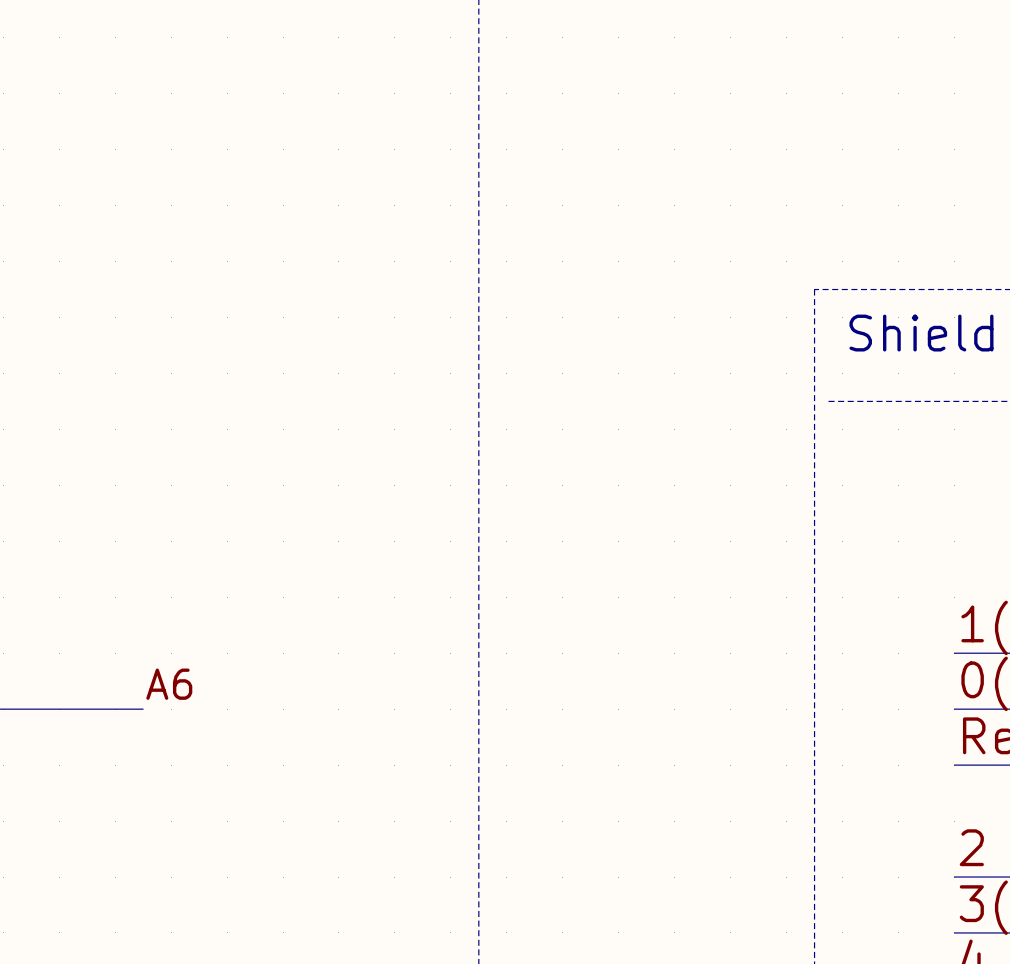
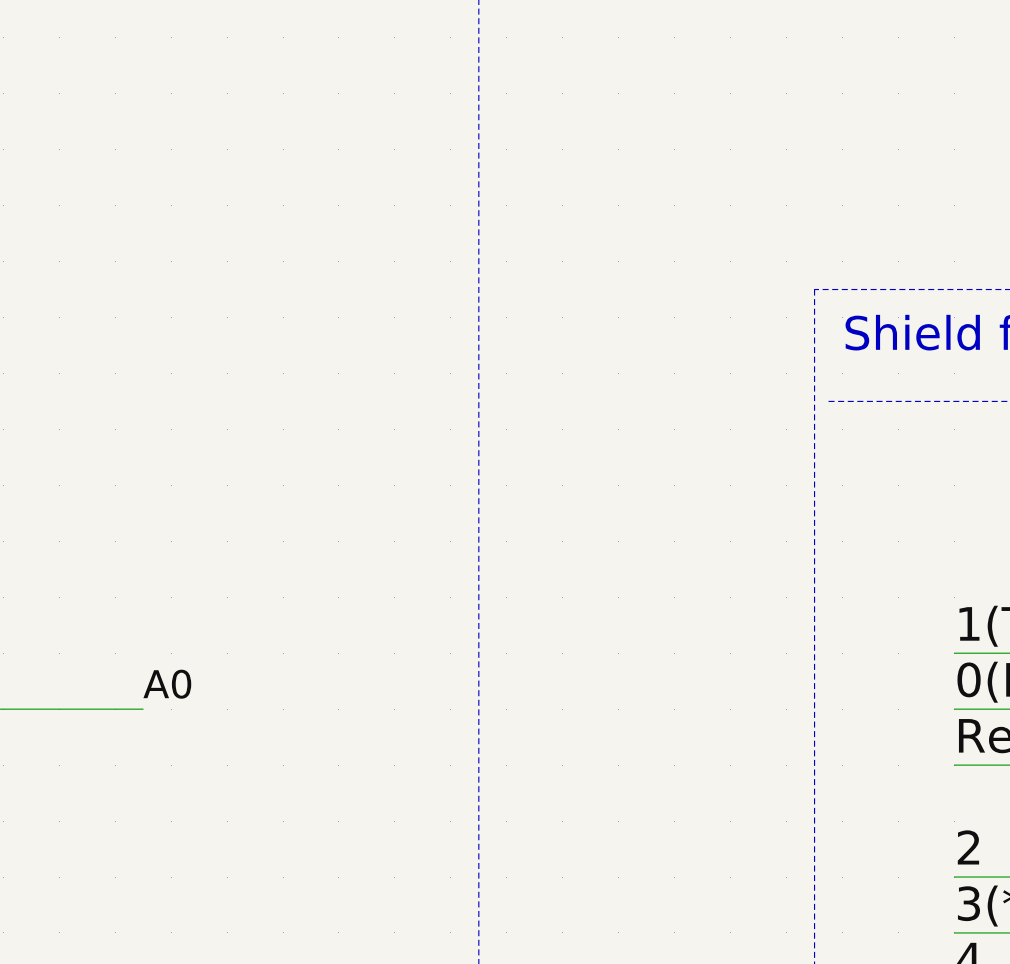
label: A6 (169, 684) -> A0 (167, 684)

